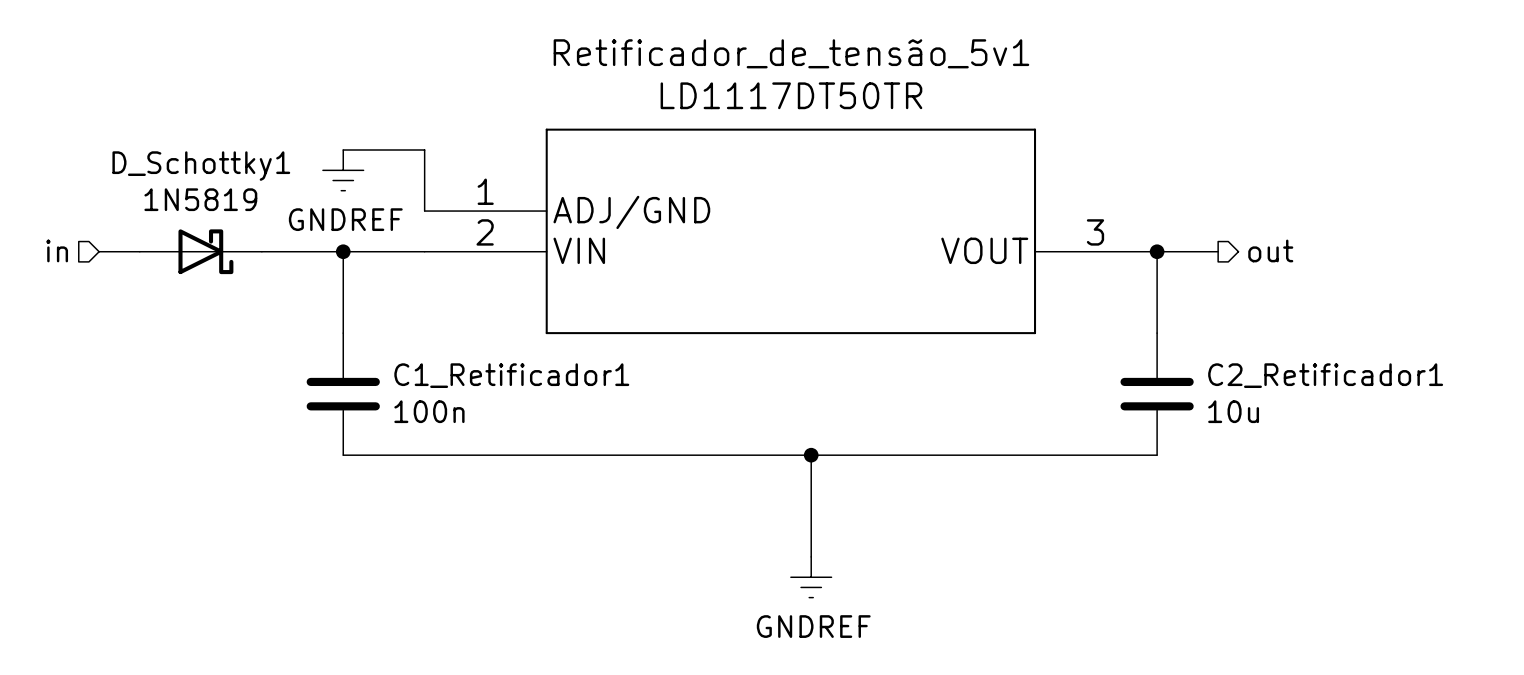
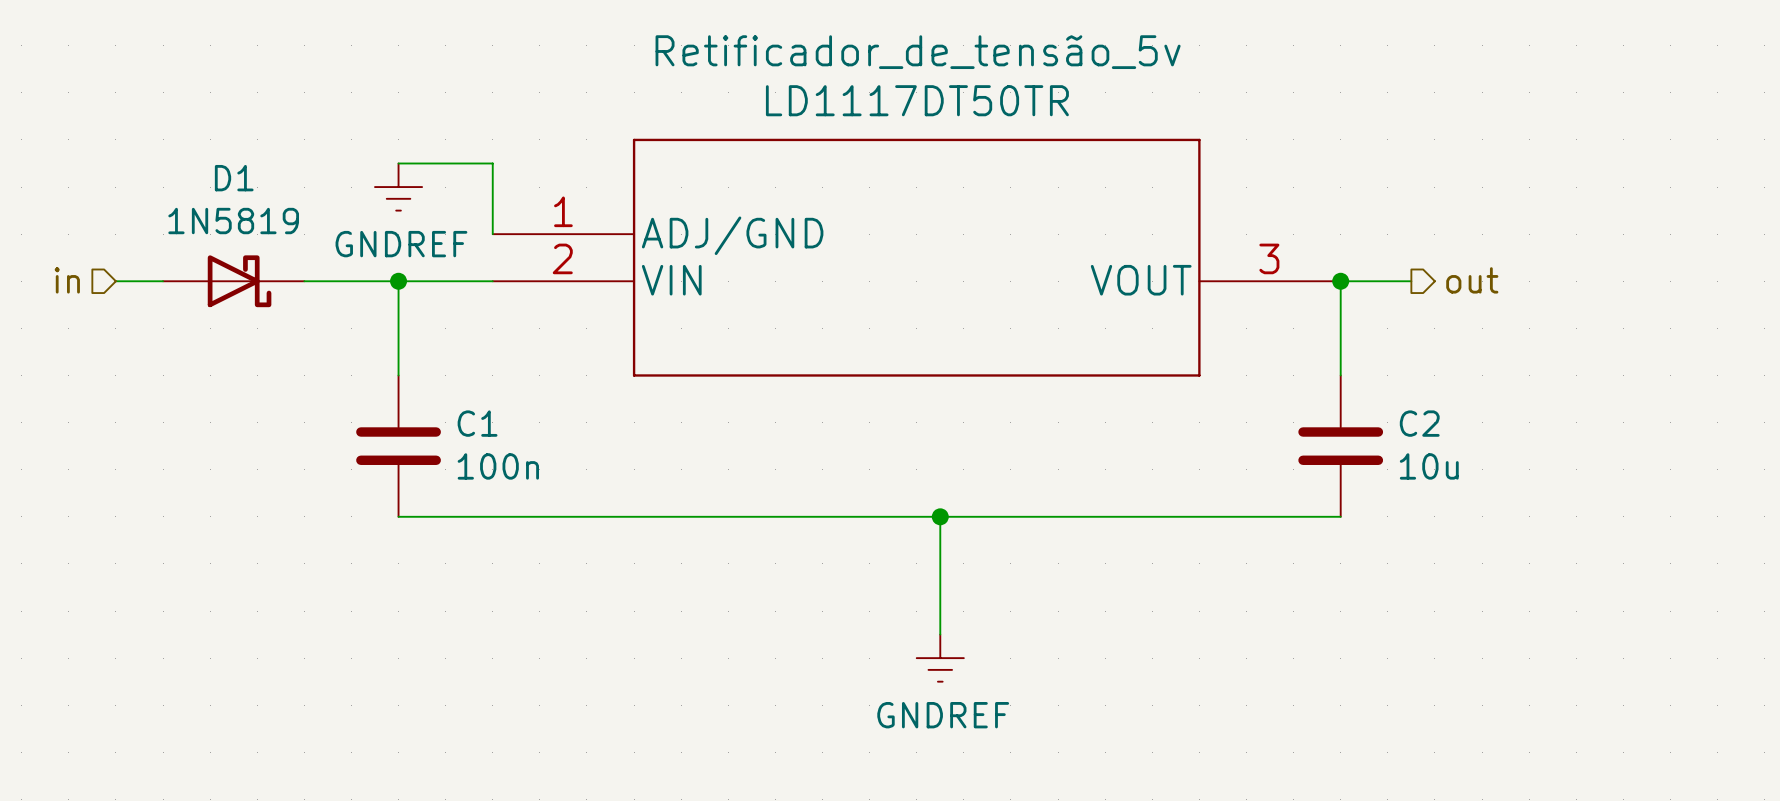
Retificador_de_tensão_5v1 name: Retificador_de_tensão_5v1 (791, 53) -> Retificador_de_tensão_5v (918, 52)
D_Schottky1 name: D_Schottky1 (201, 166) -> D1 (234, 178)
C1_Retificador1 name: C1_Retificador1 (511, 375) -> C1 (477, 423)
C2_Retificador1 name: C2_Retificador1 (1325, 375) -> C2 (1419, 423)

